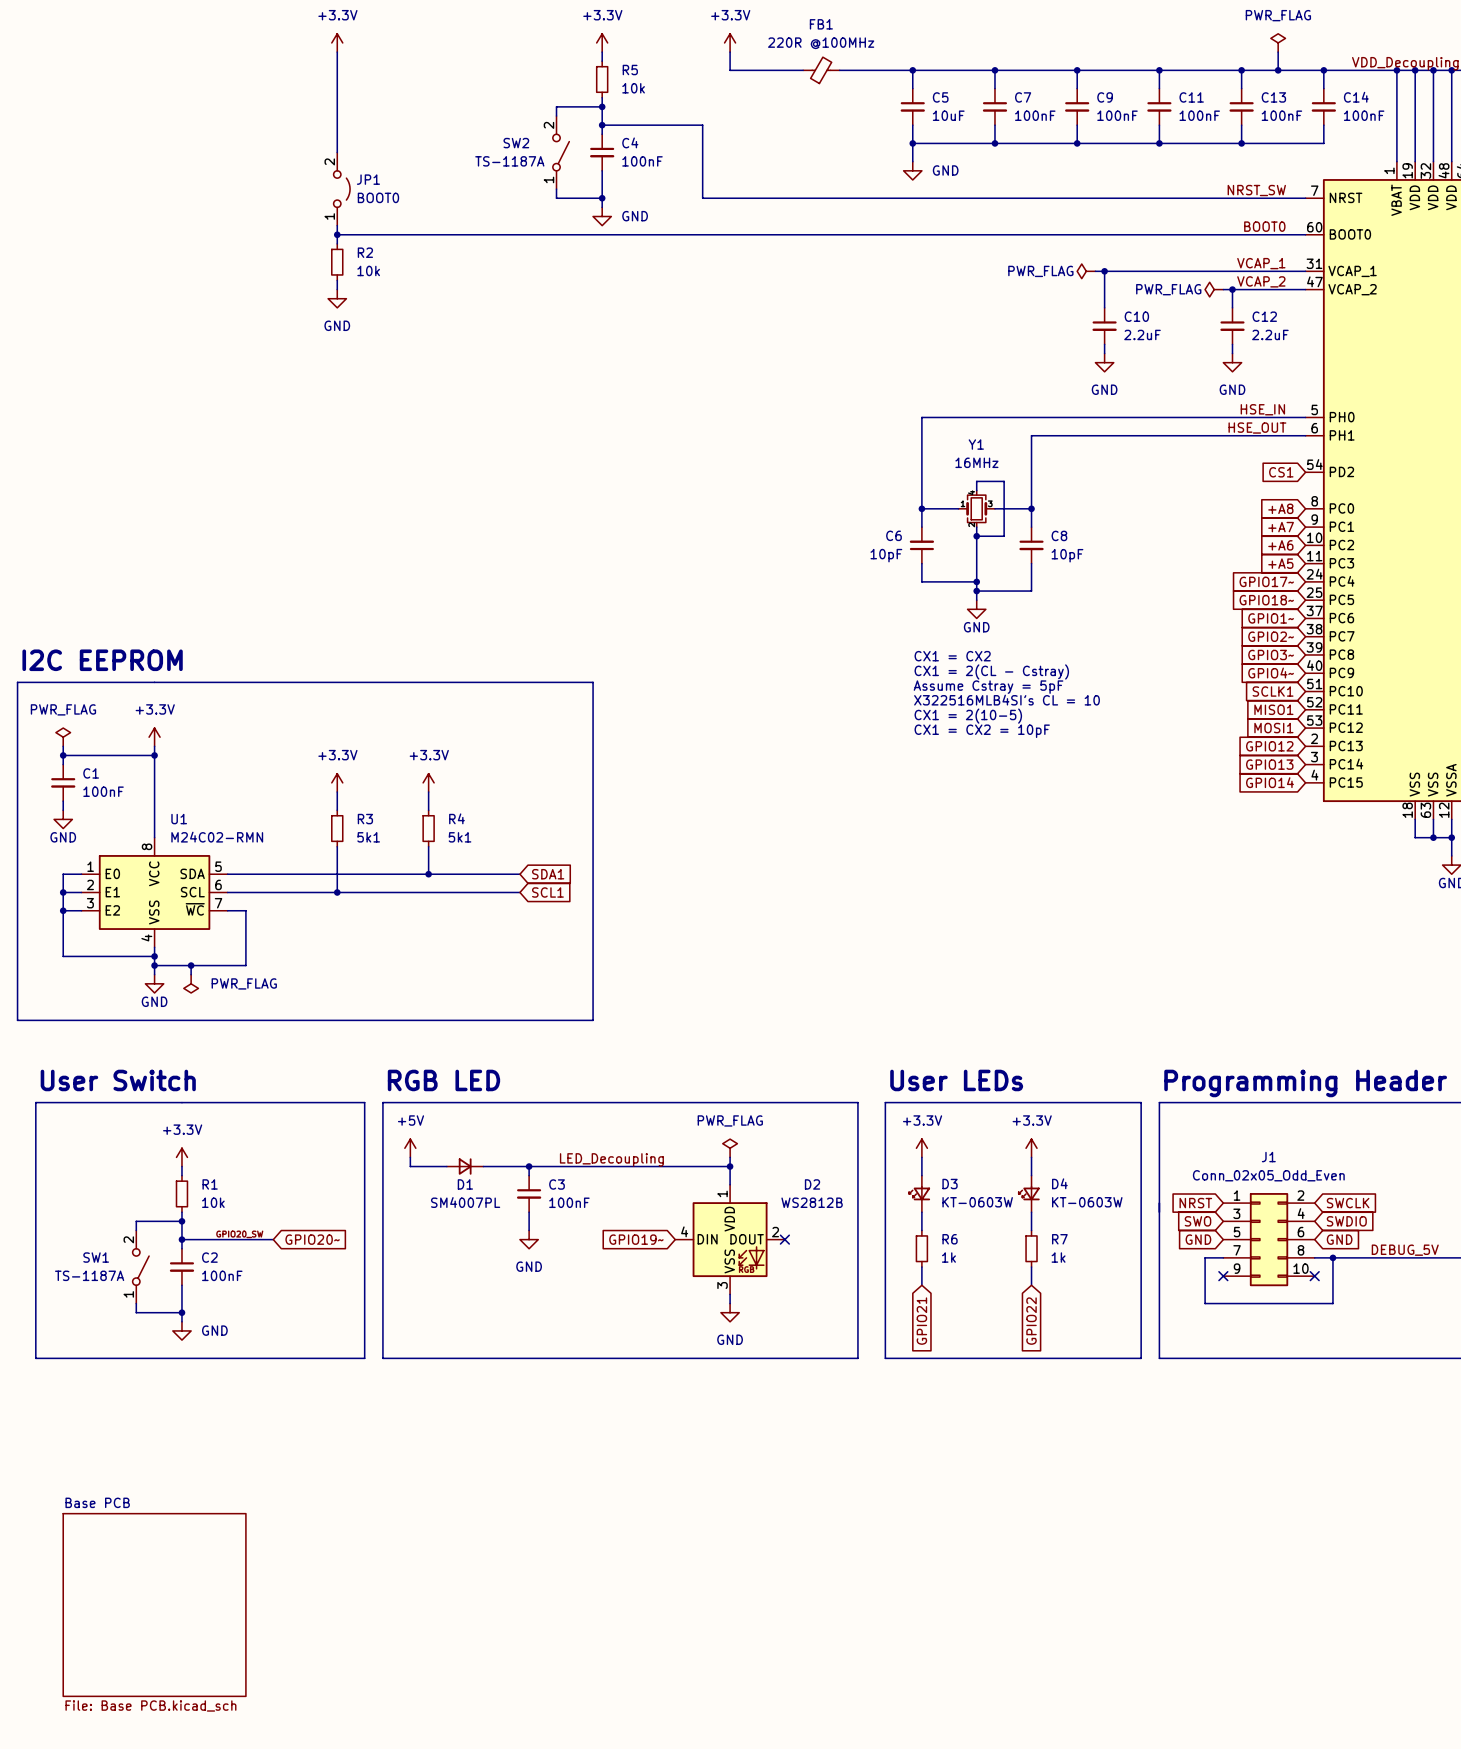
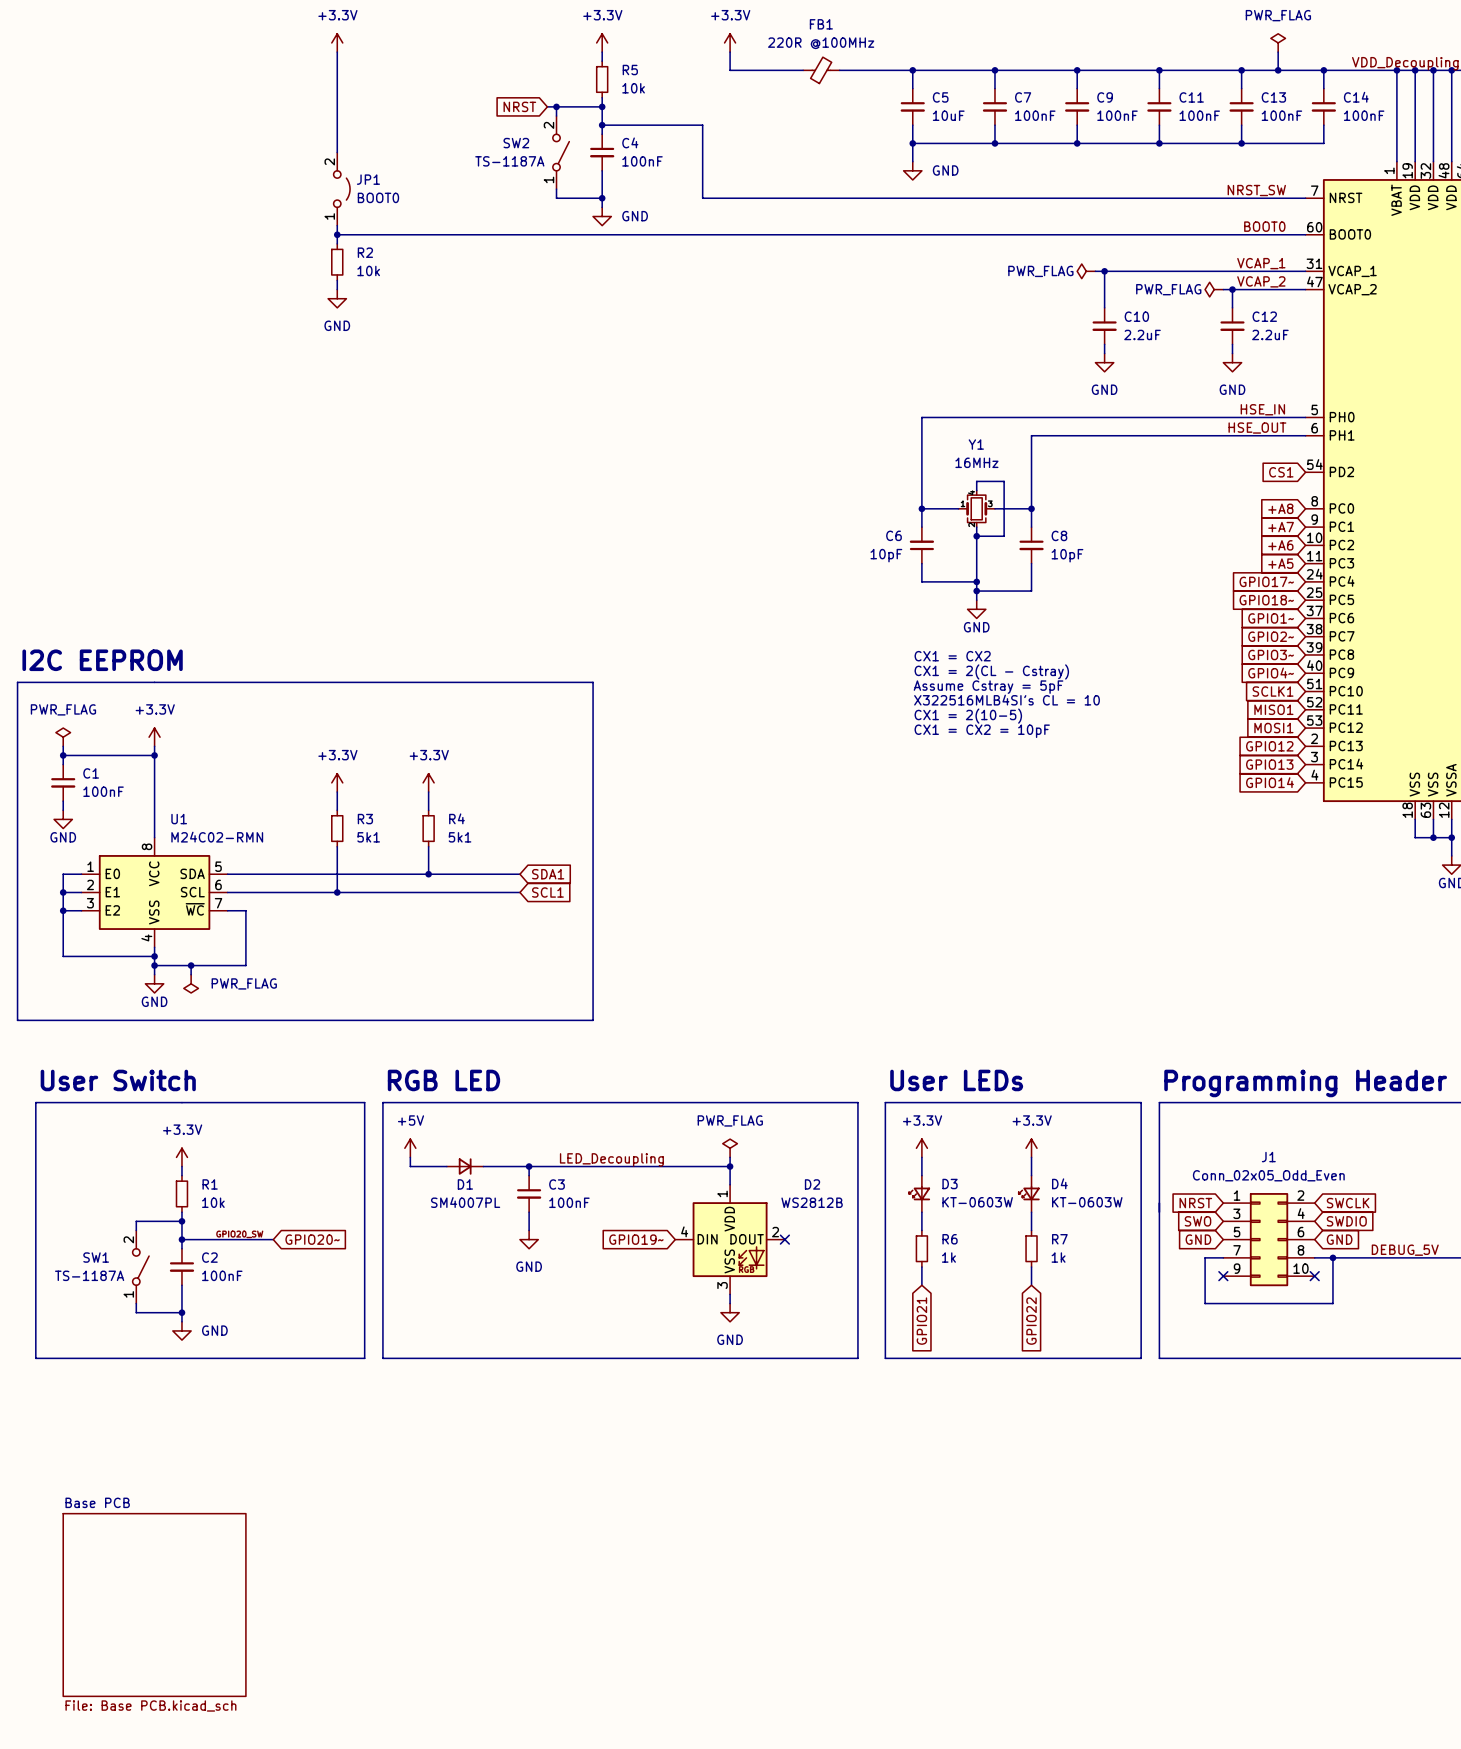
global label: none -> NRST (519, 106)
wire: none -> (547, 106) (556, 106)
junction: none -> (556, 106)

